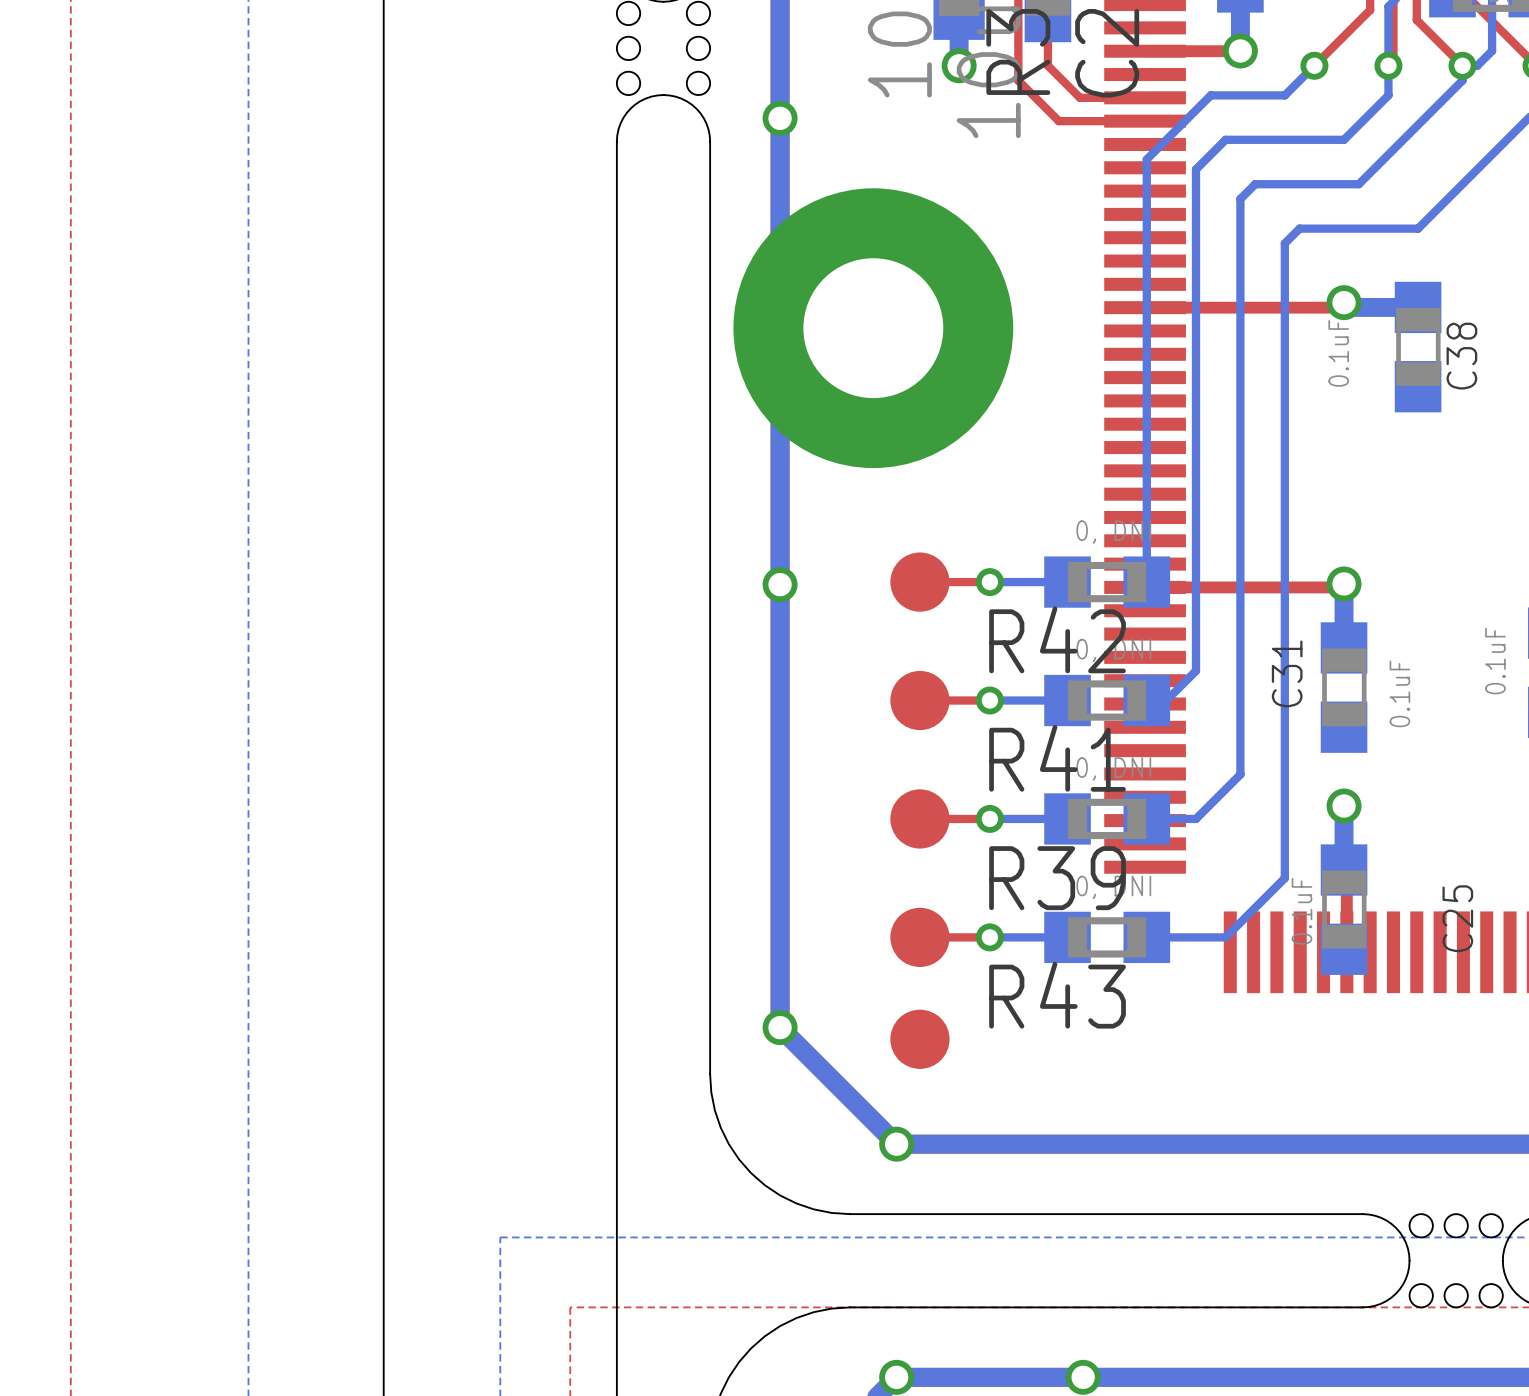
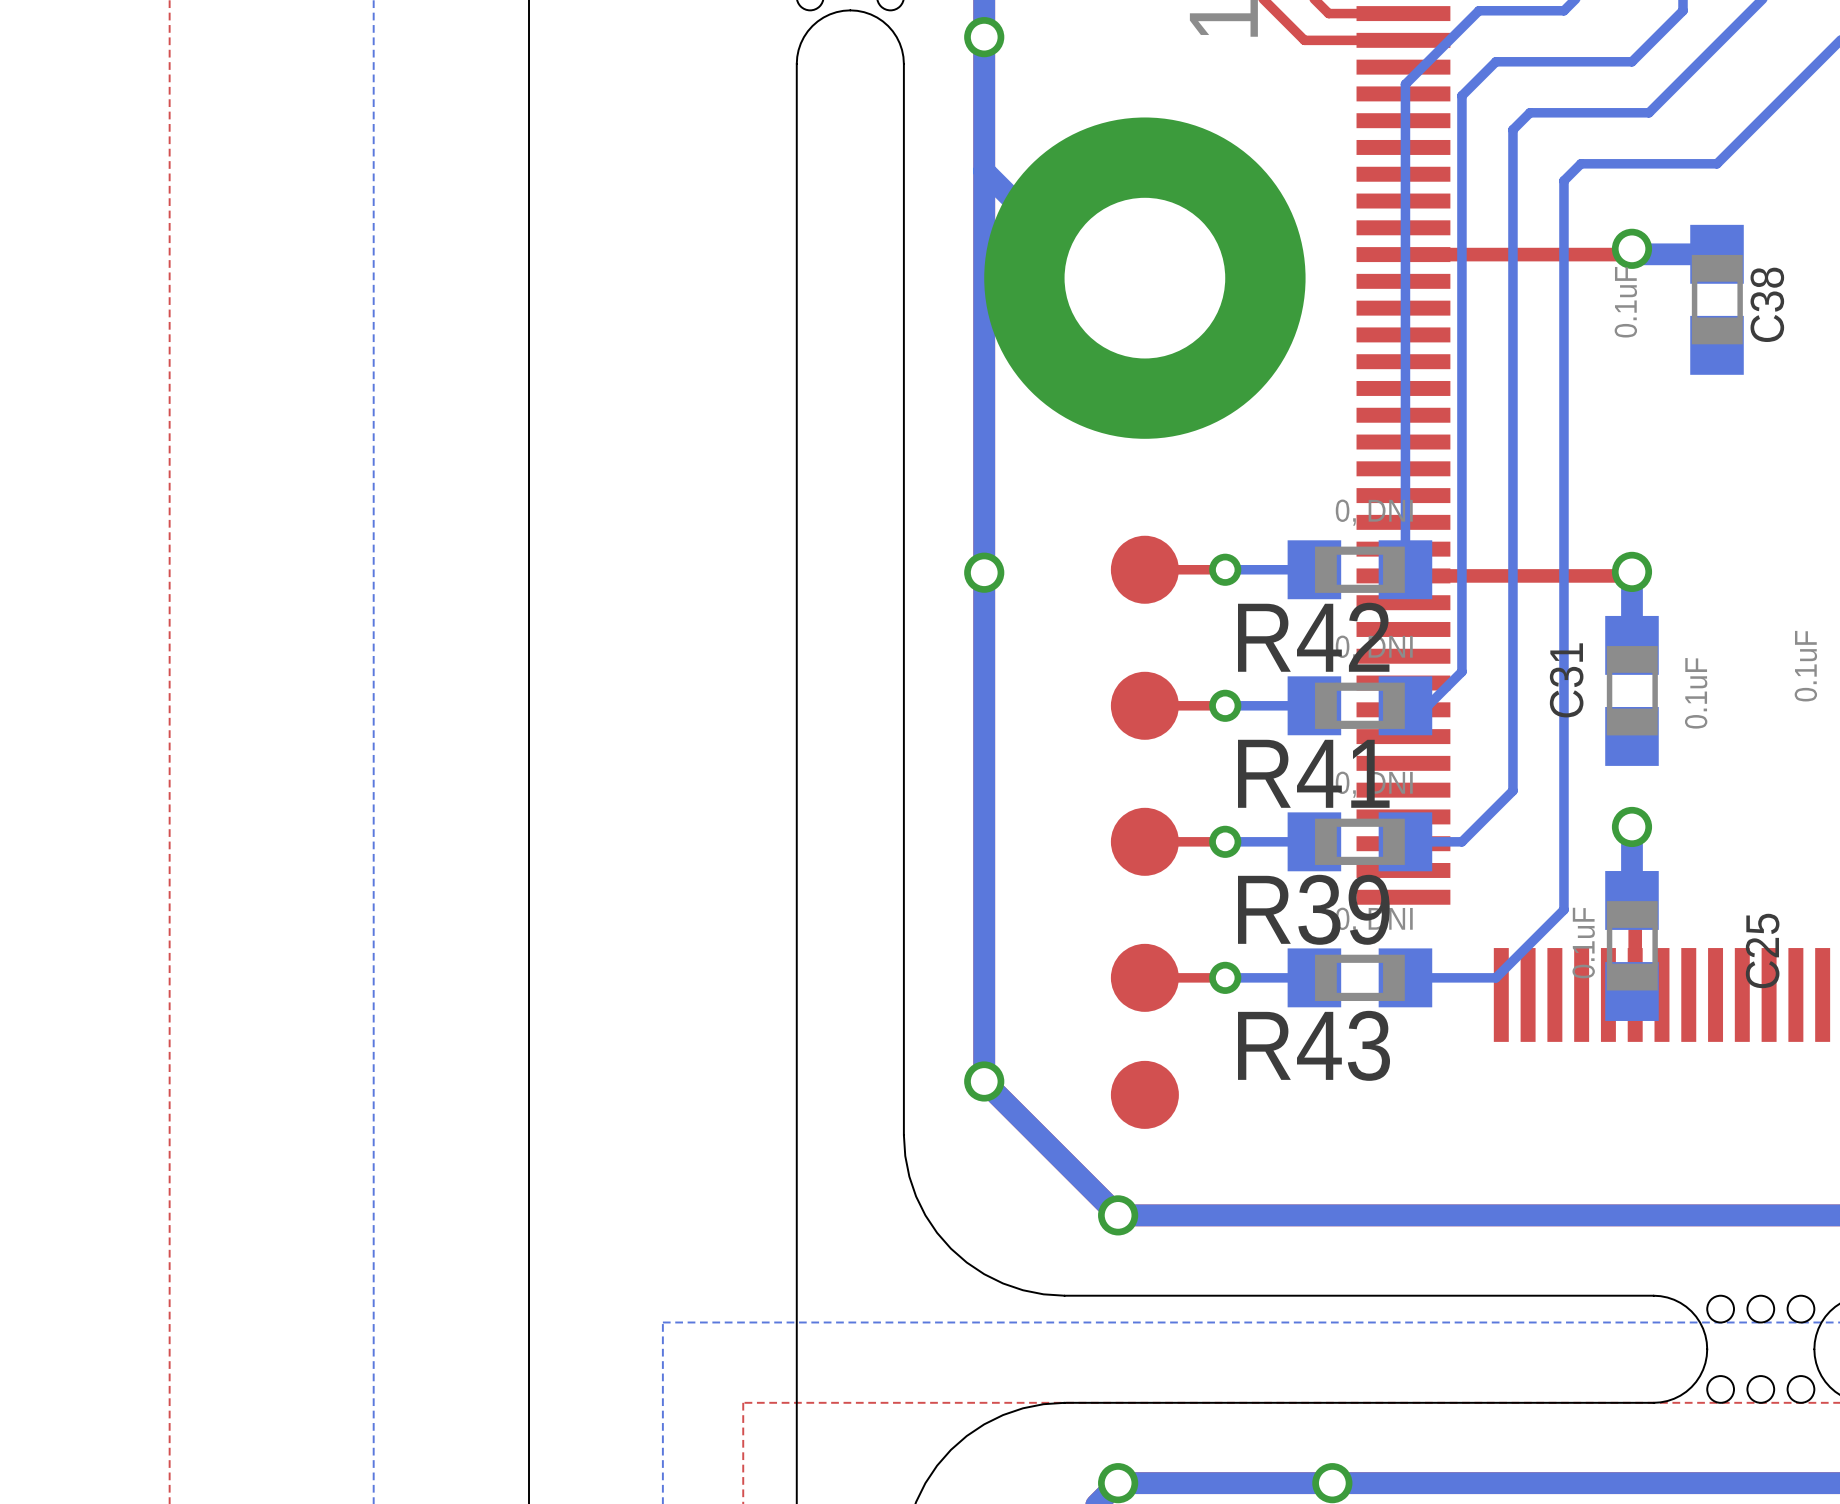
part position: (873, 328) -> (1144, 278)

